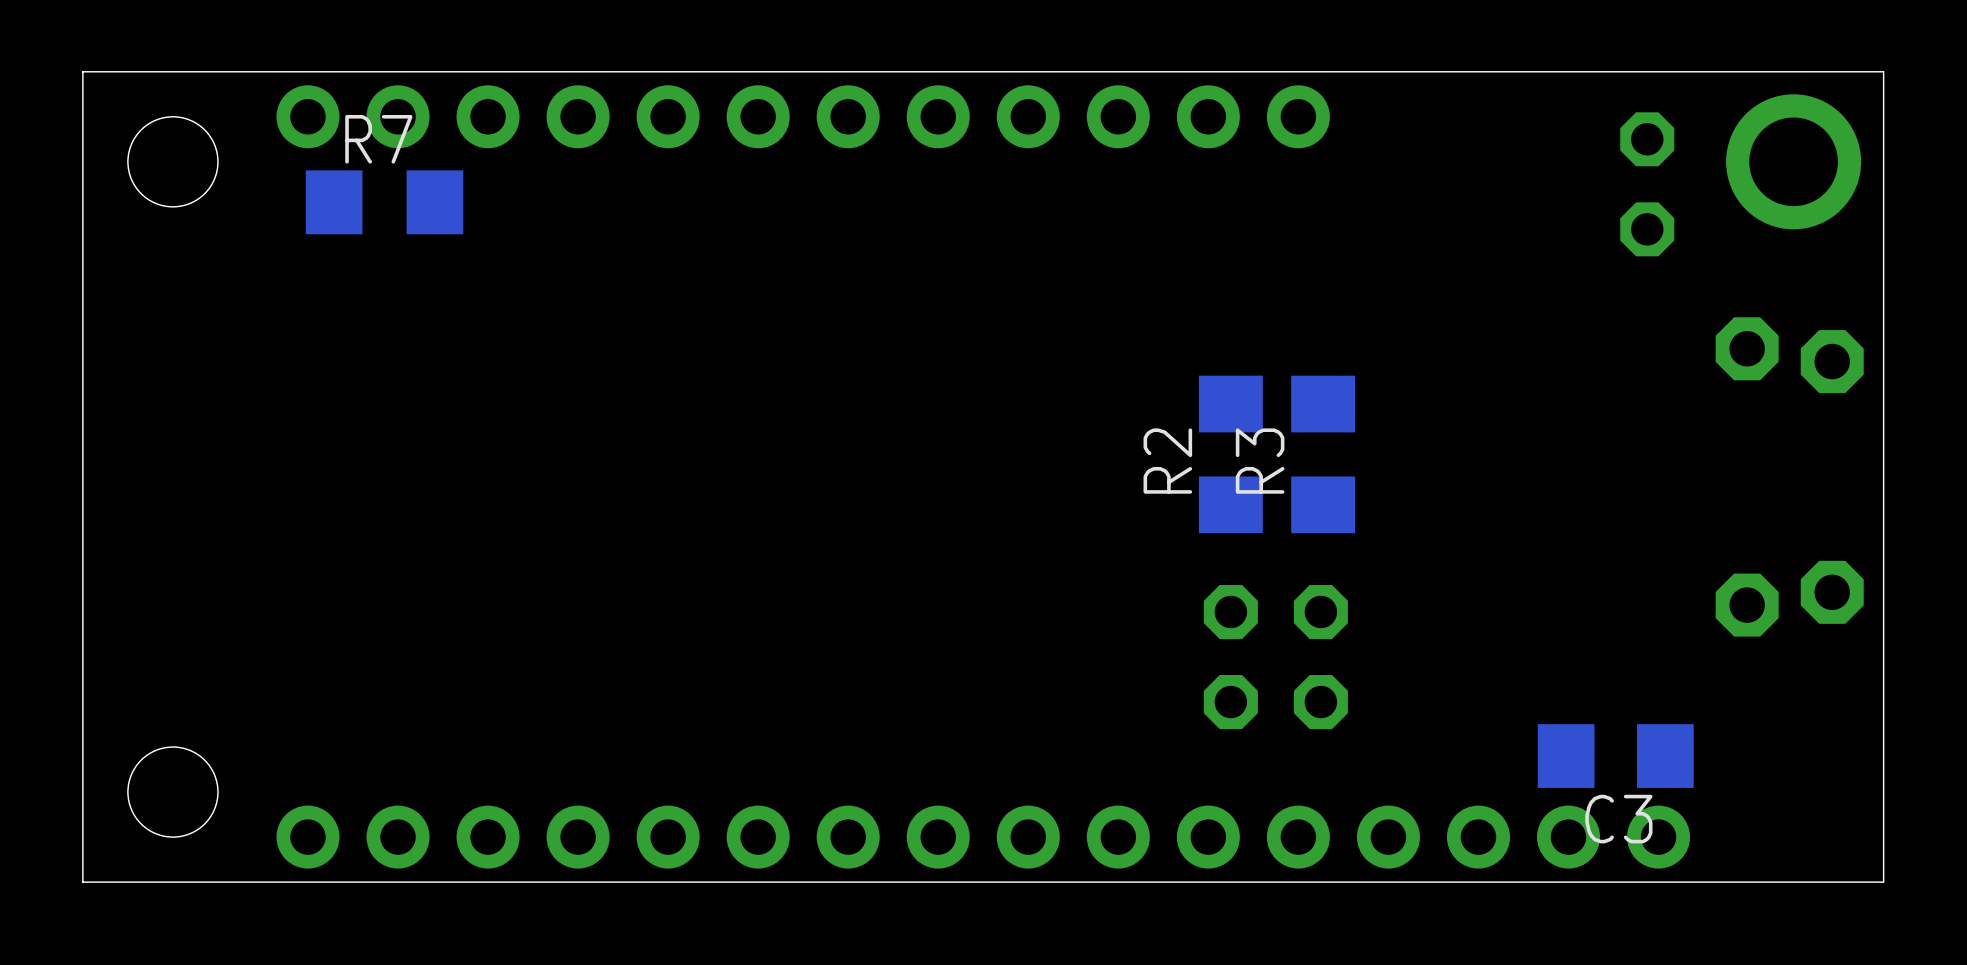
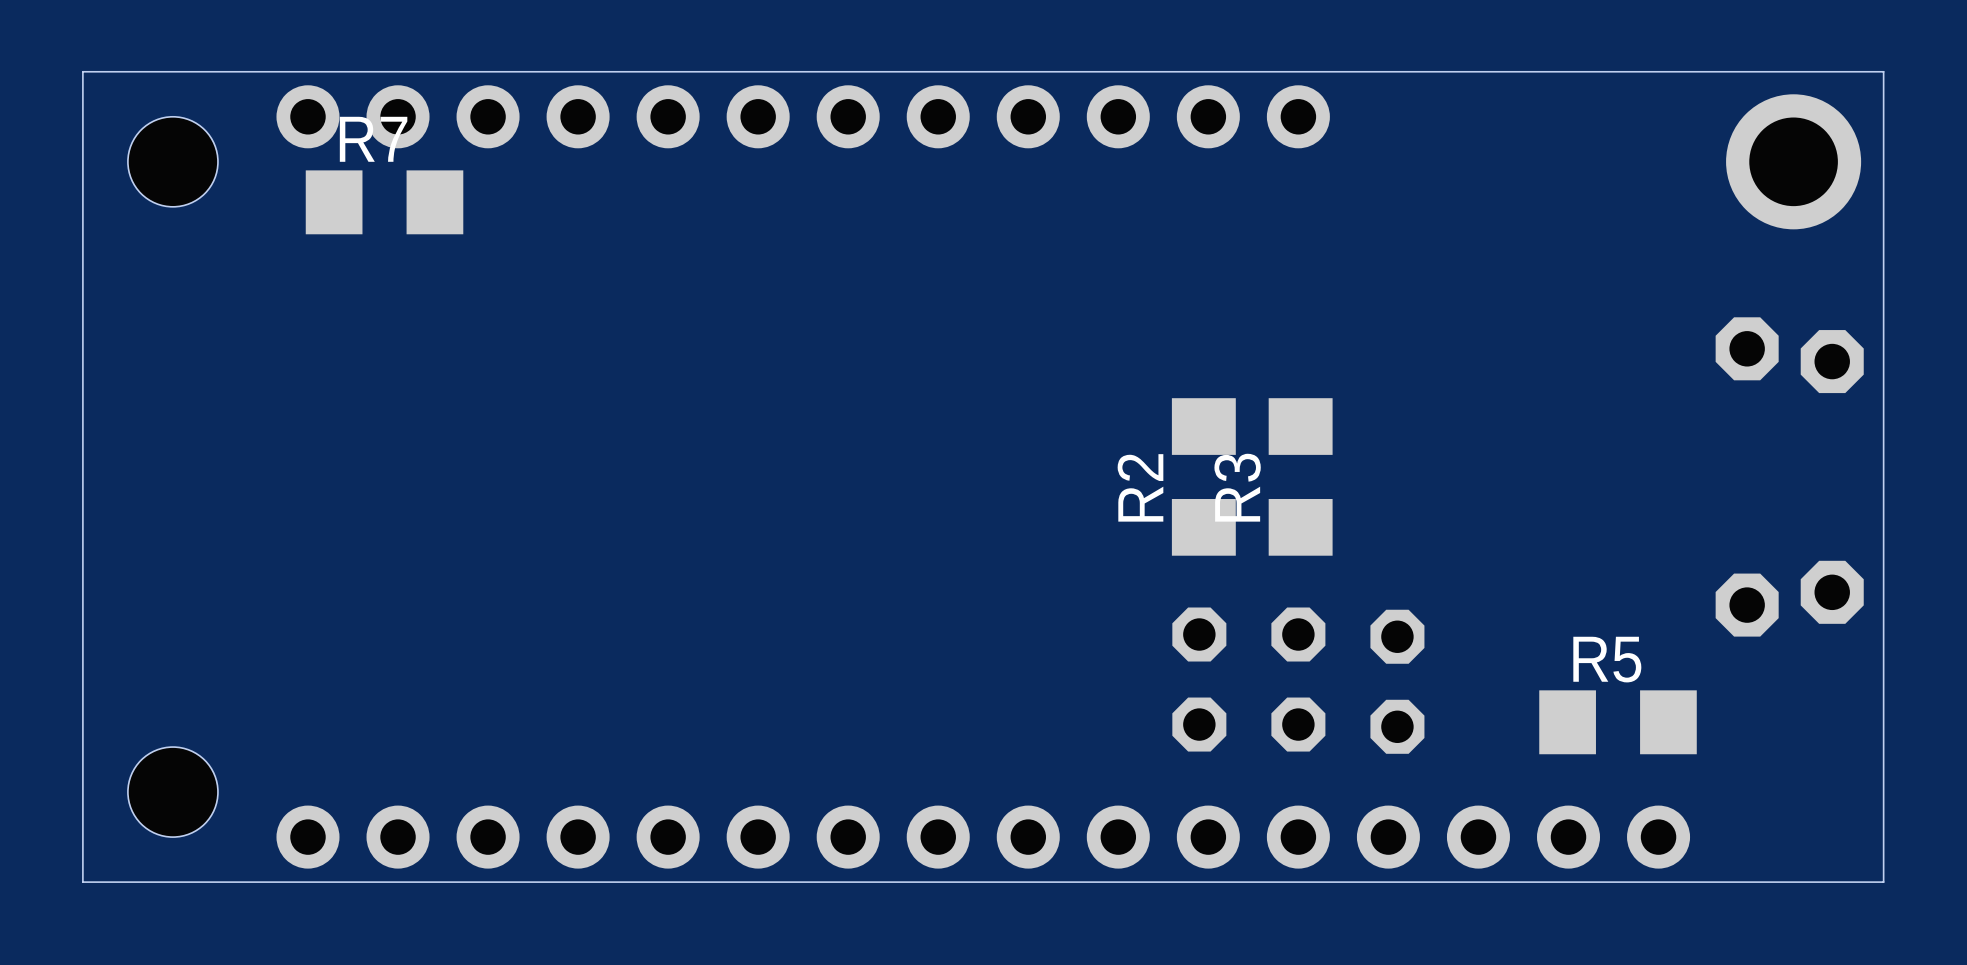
part: (1647, 184) -> none
R2 position: (1230, 454) -> (1203, 476)
R3 position: (1323, 454) -> (1300, 476)
part position: (1230, 657) -> (1199, 679)
part position: (1320, 657) -> (1298, 679)
part: none -> (1397, 681)
R5: none -> (1618, 722)
C3: (1615, 756) -> none

